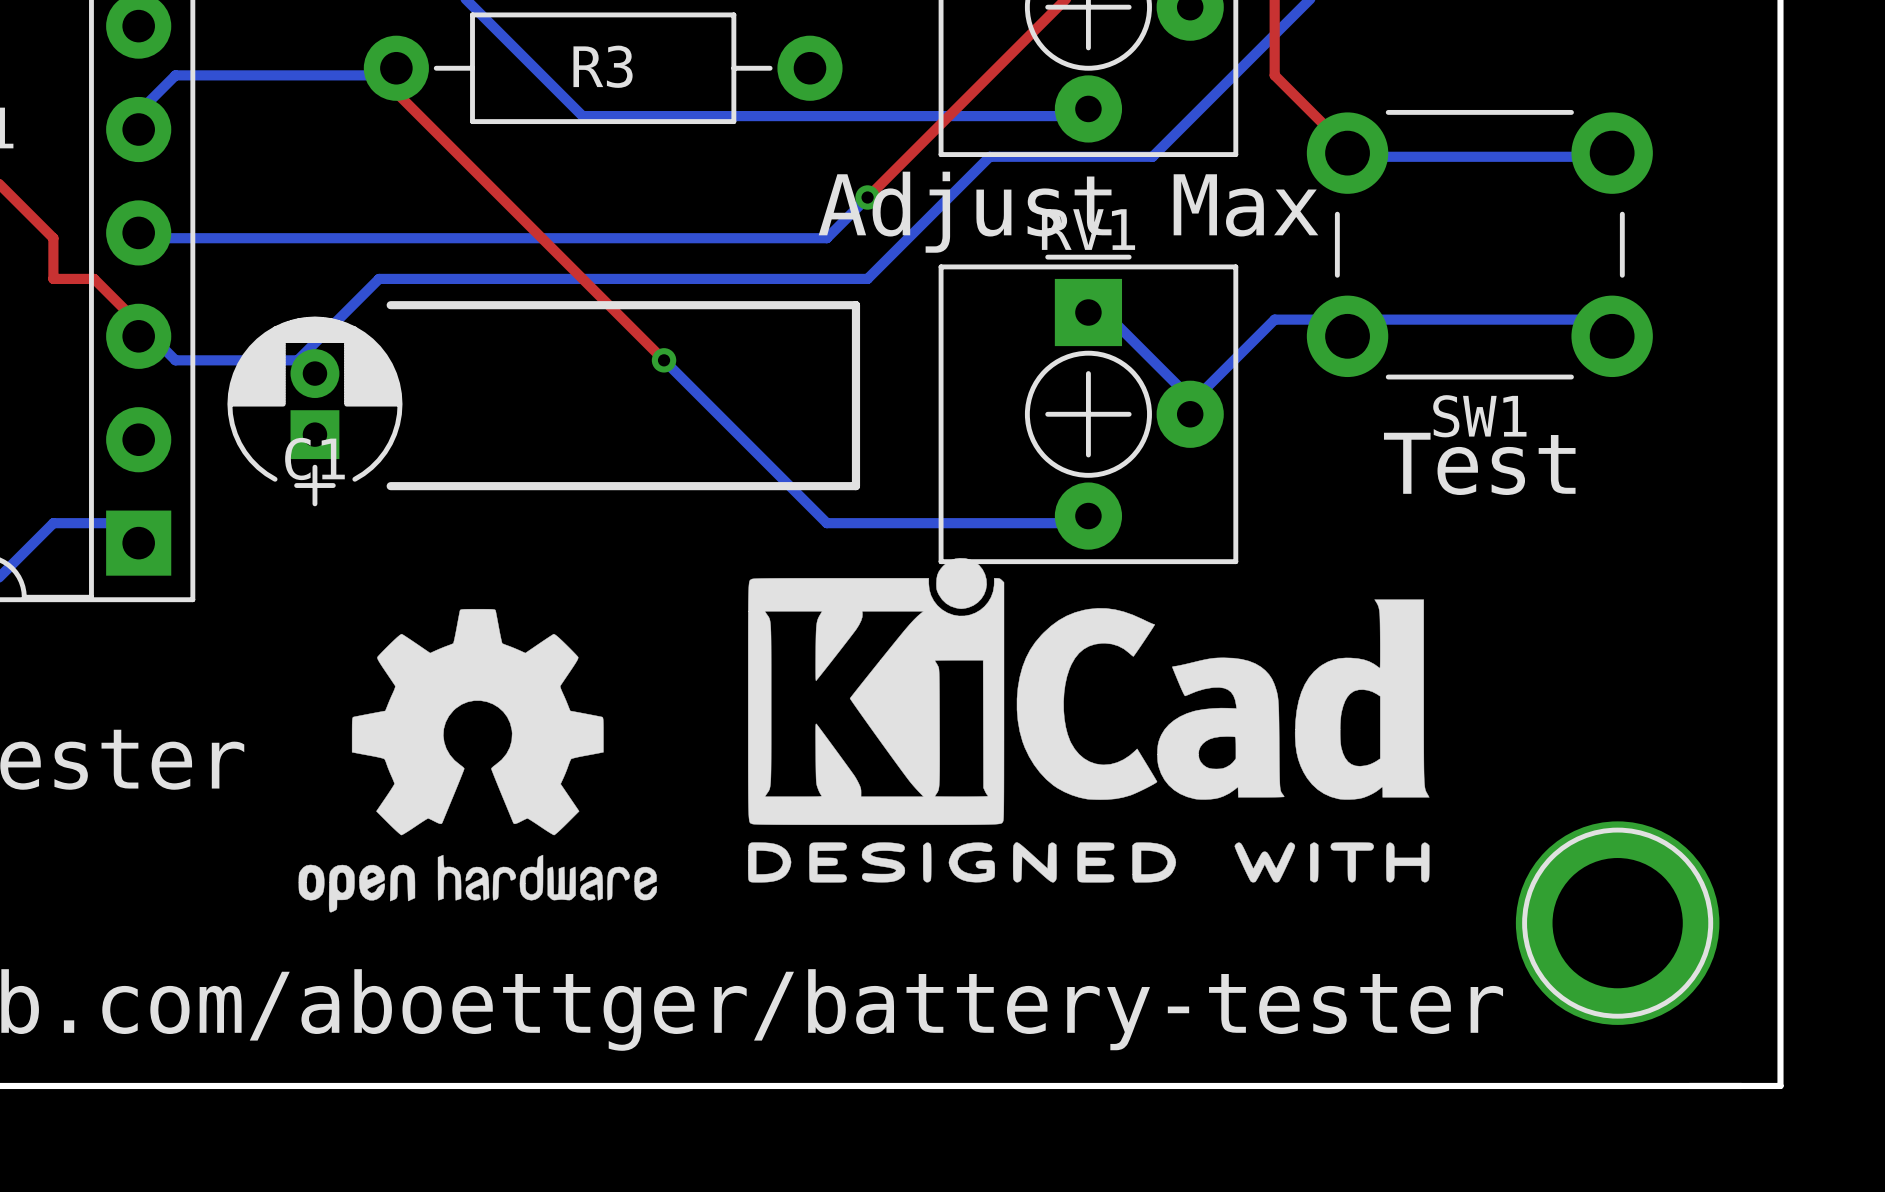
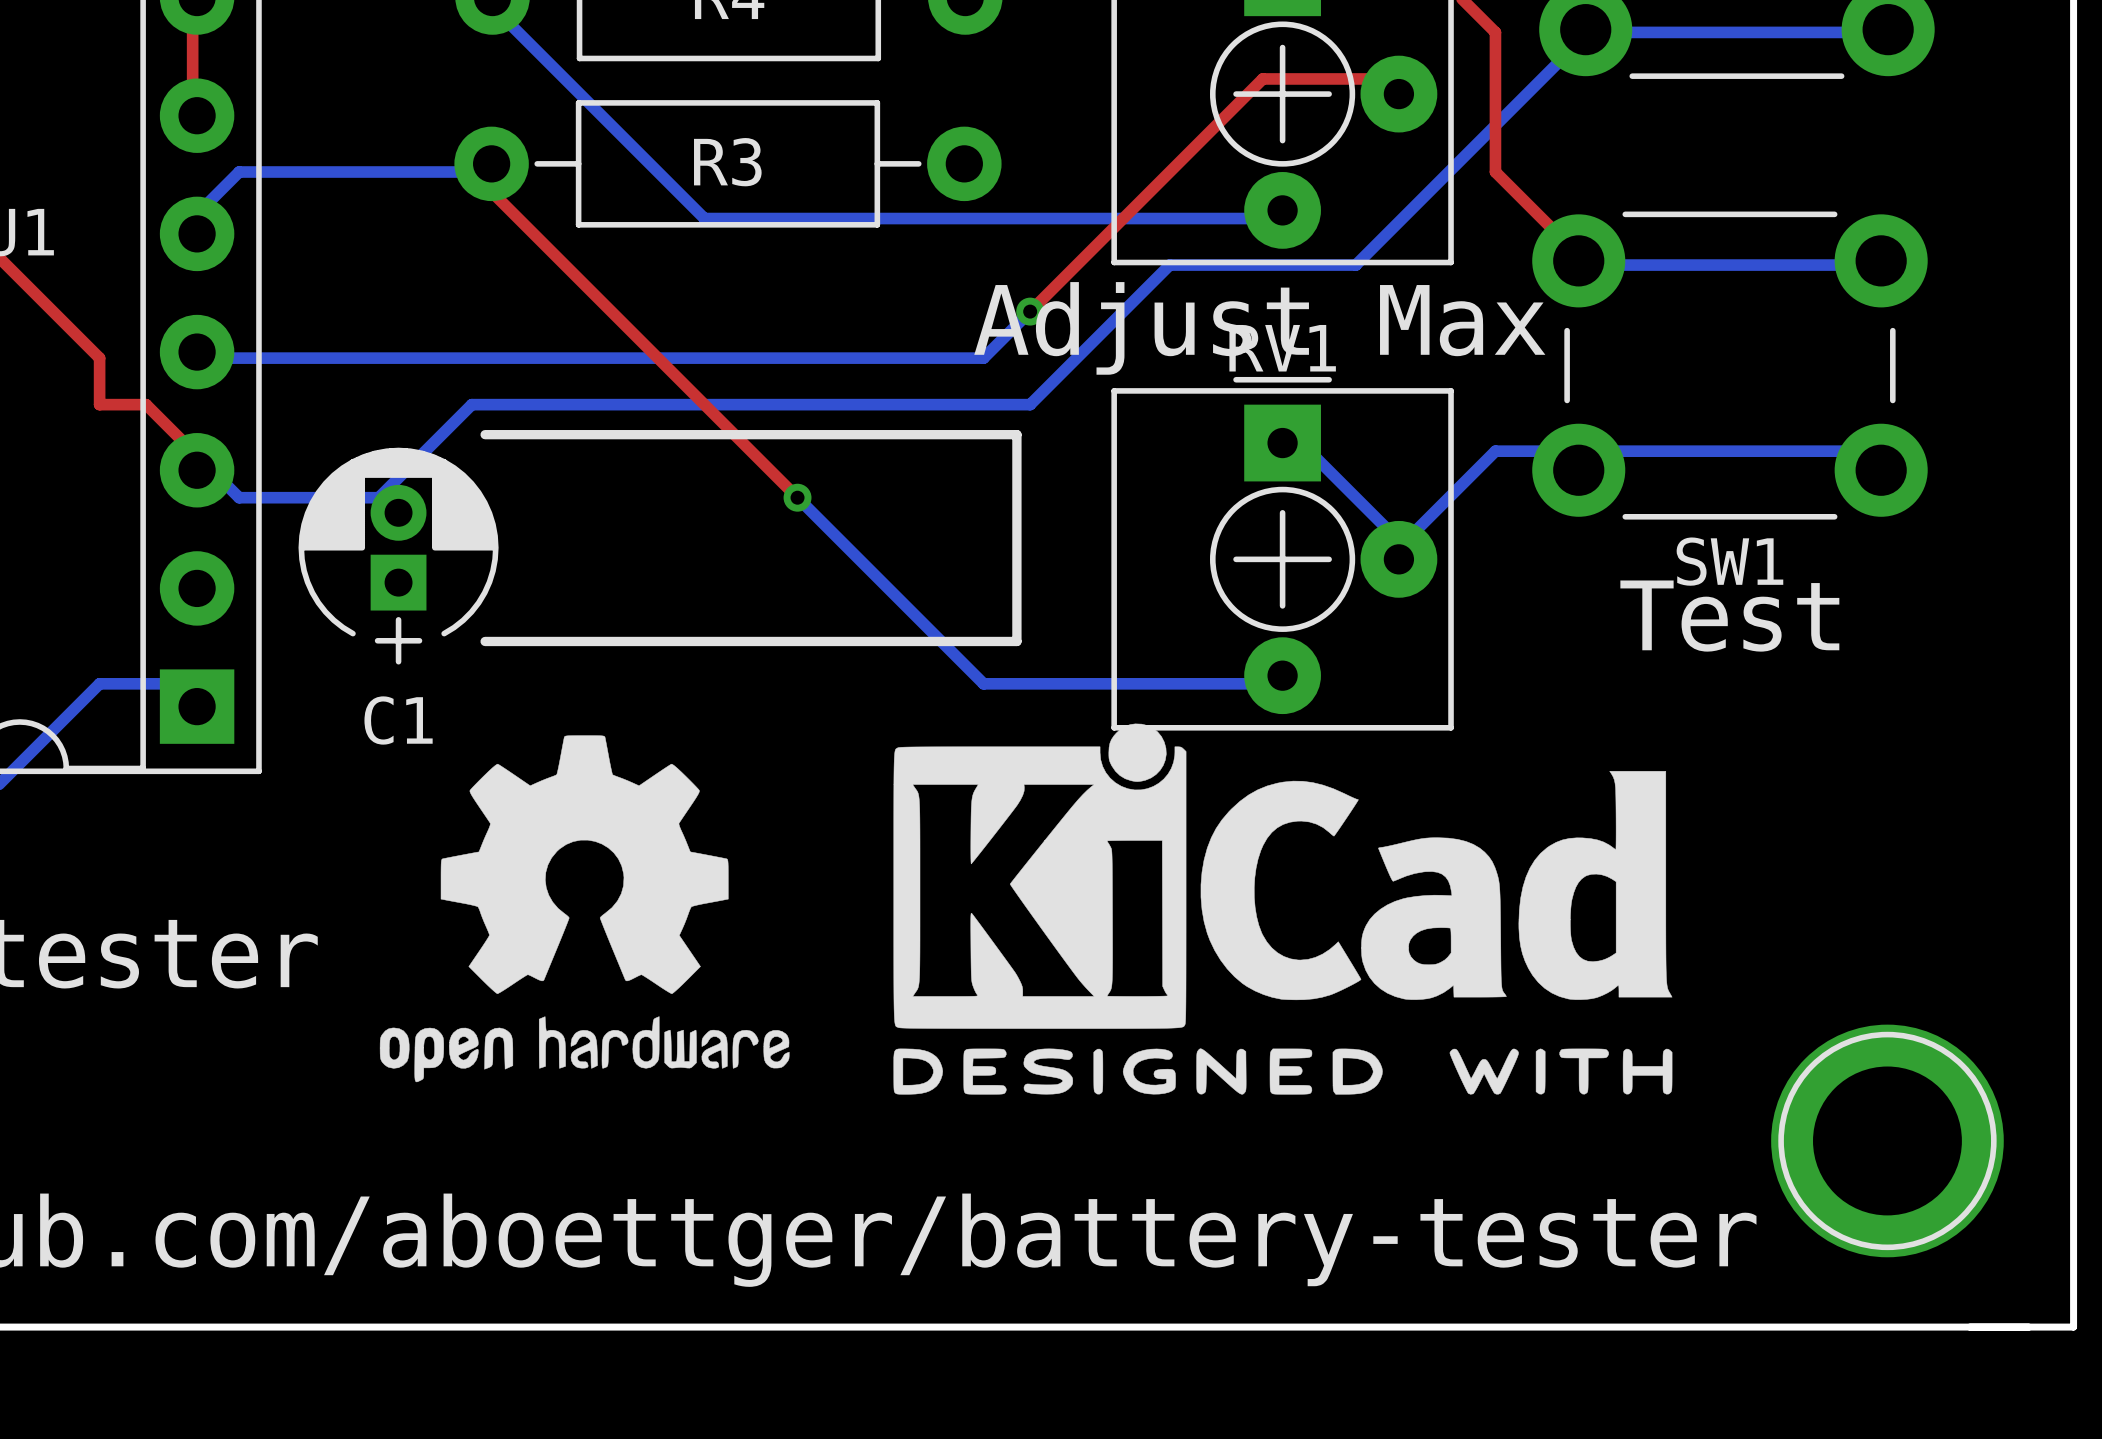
C1 name position: C1 (314, 458) -> C1 (398, 720)
drawing position: (477, 760) -> (584, 908)

